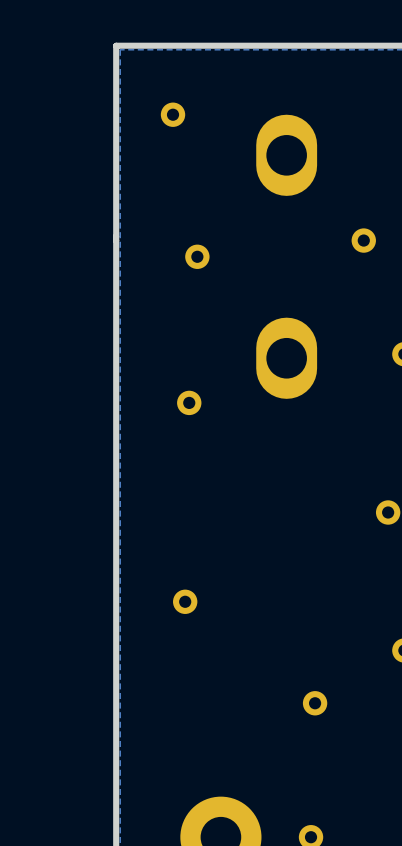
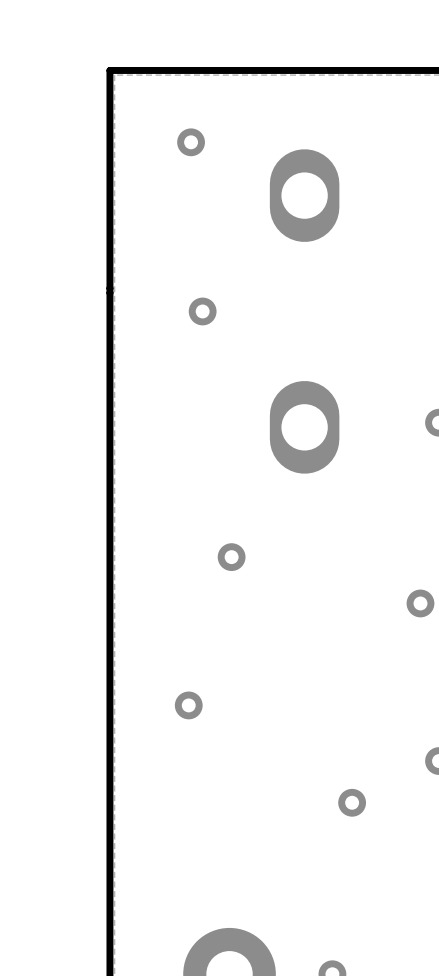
part position: (173, 114) -> (191, 142)
part: (363, 240) -> none
part position: (189, 402) -> (231, 557)
part position: (315, 703) -> (352, 802)

